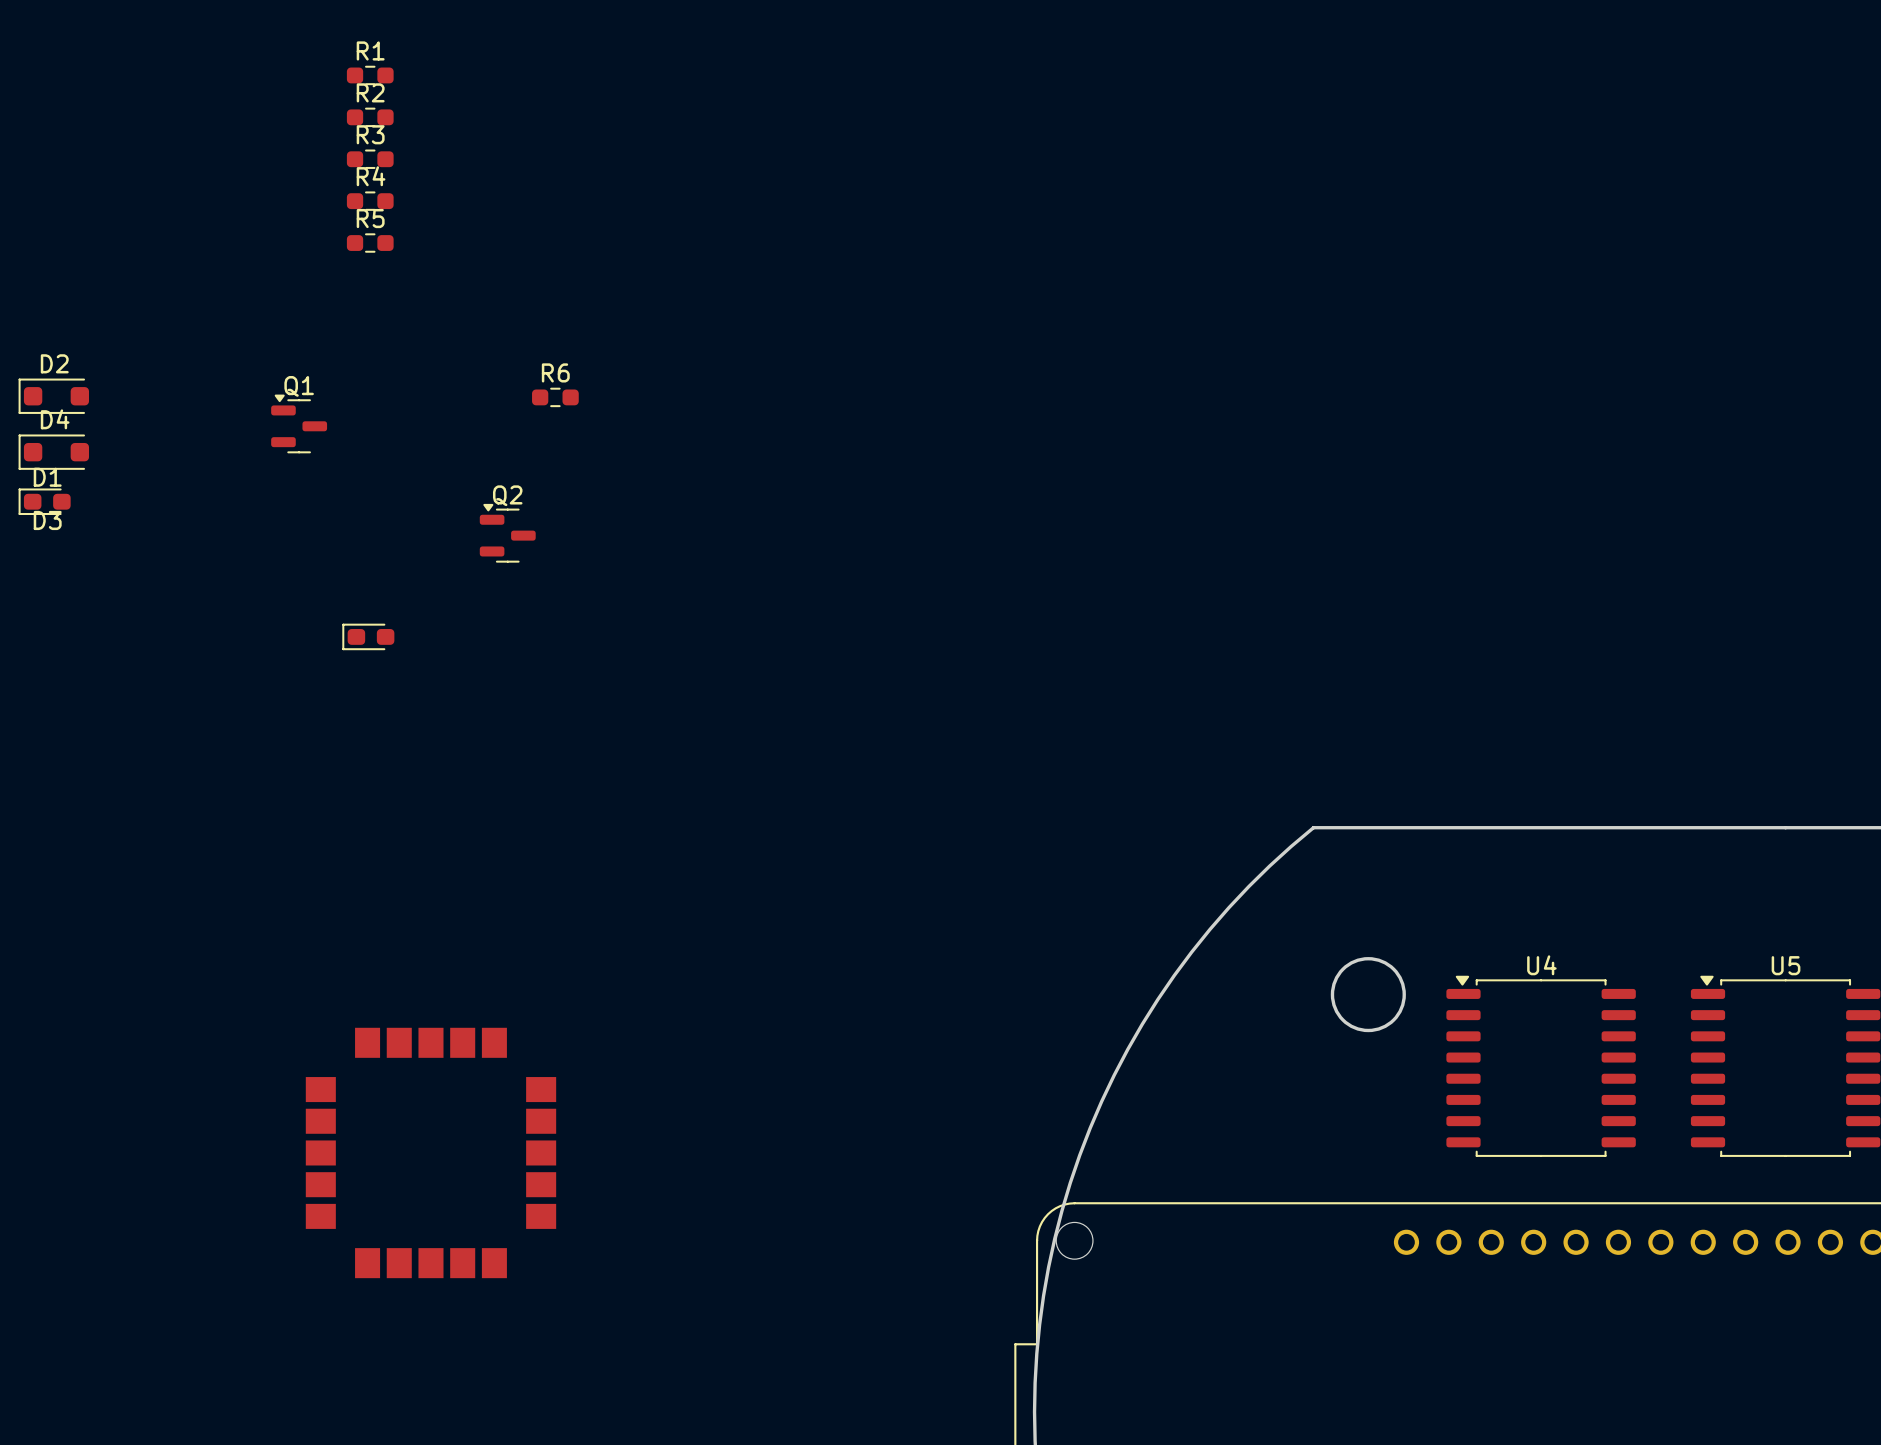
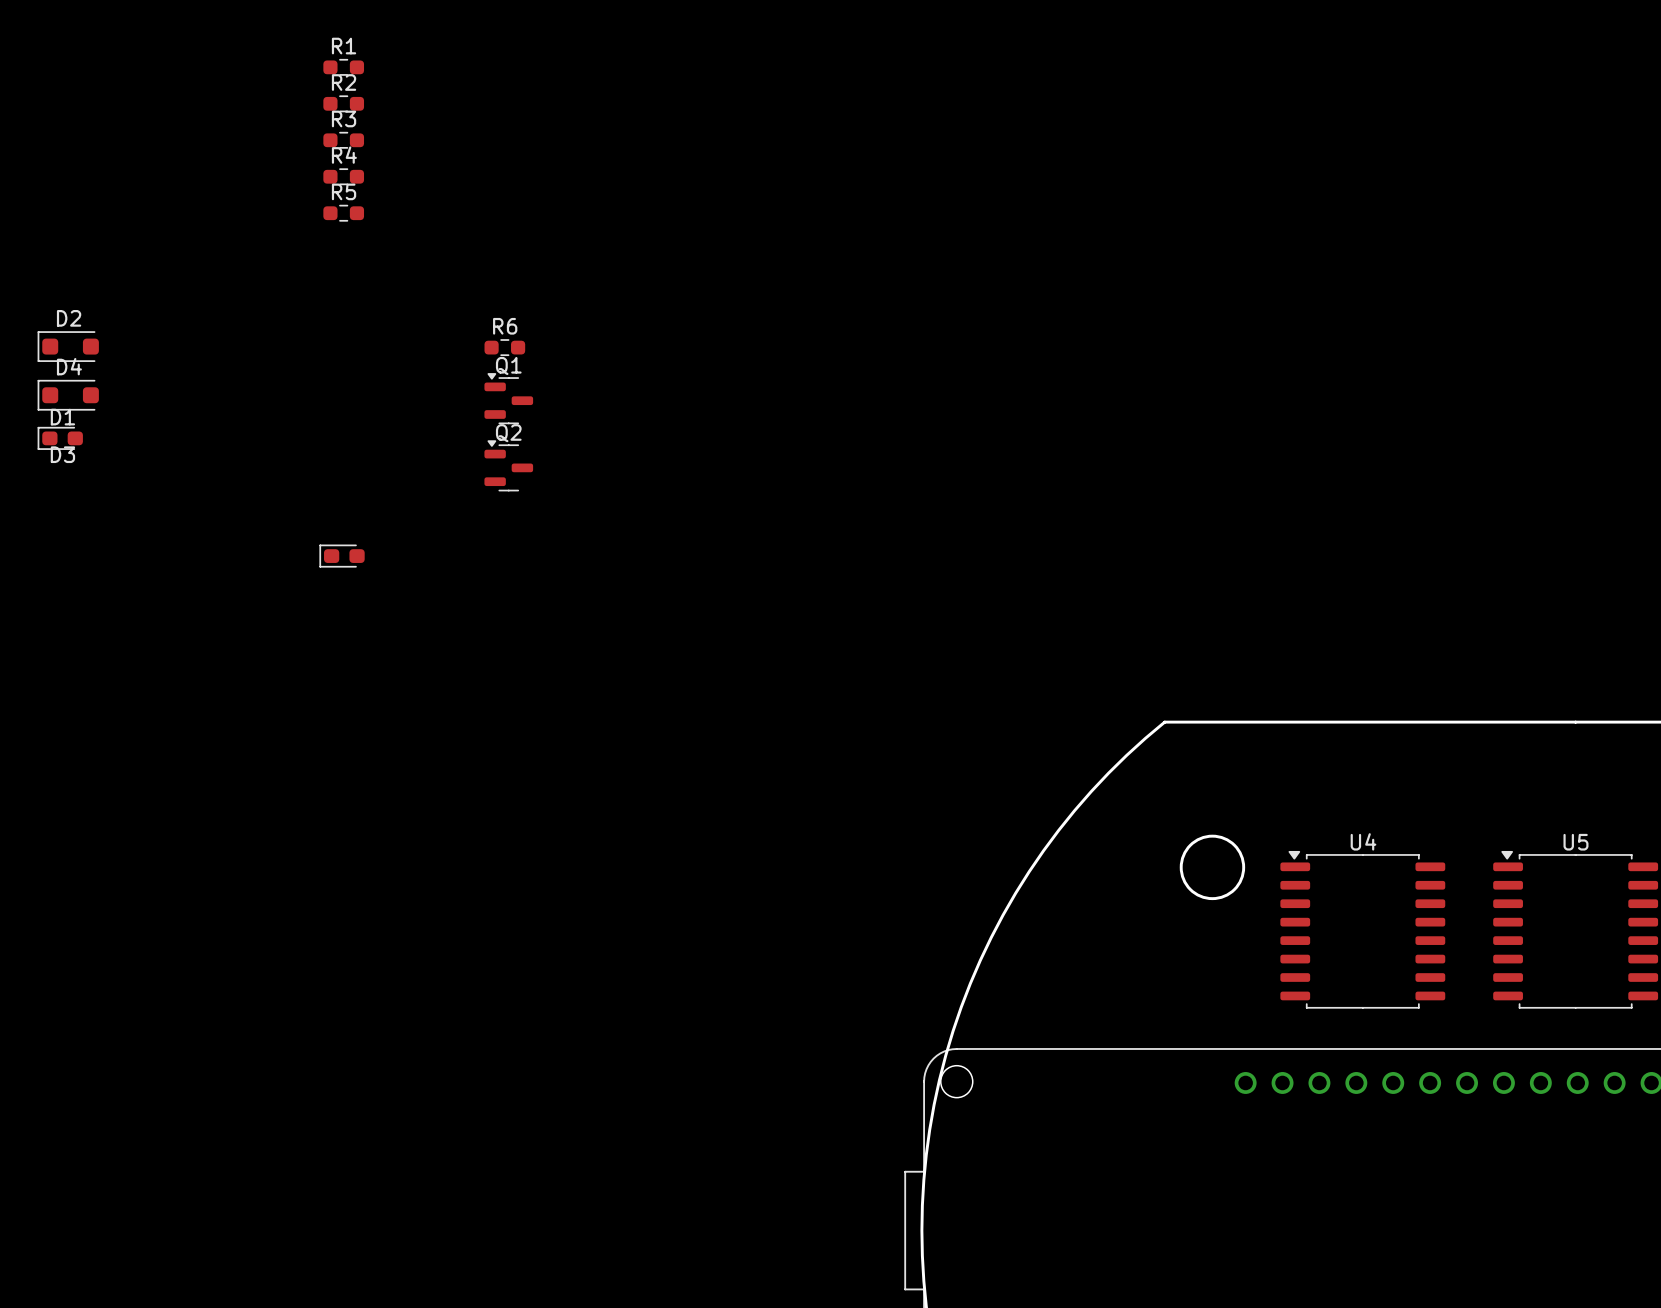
Q1 position: (299, 423) -> (508, 398)
Q2 position: (507, 533) -> (508, 465)
part: (430, 1152) -> none

